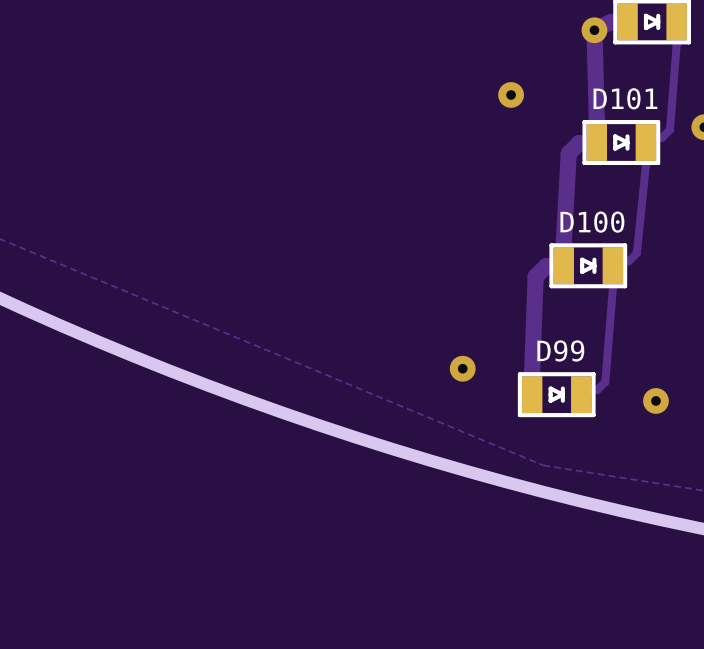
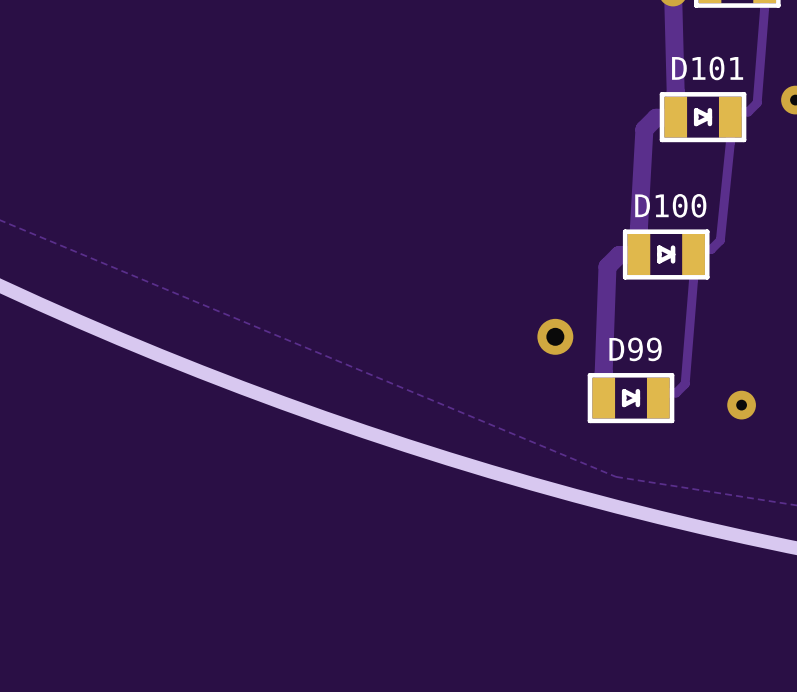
via: (511, 94) -> none
via: none -> (555, 336)
via: (462, 368) -> none

